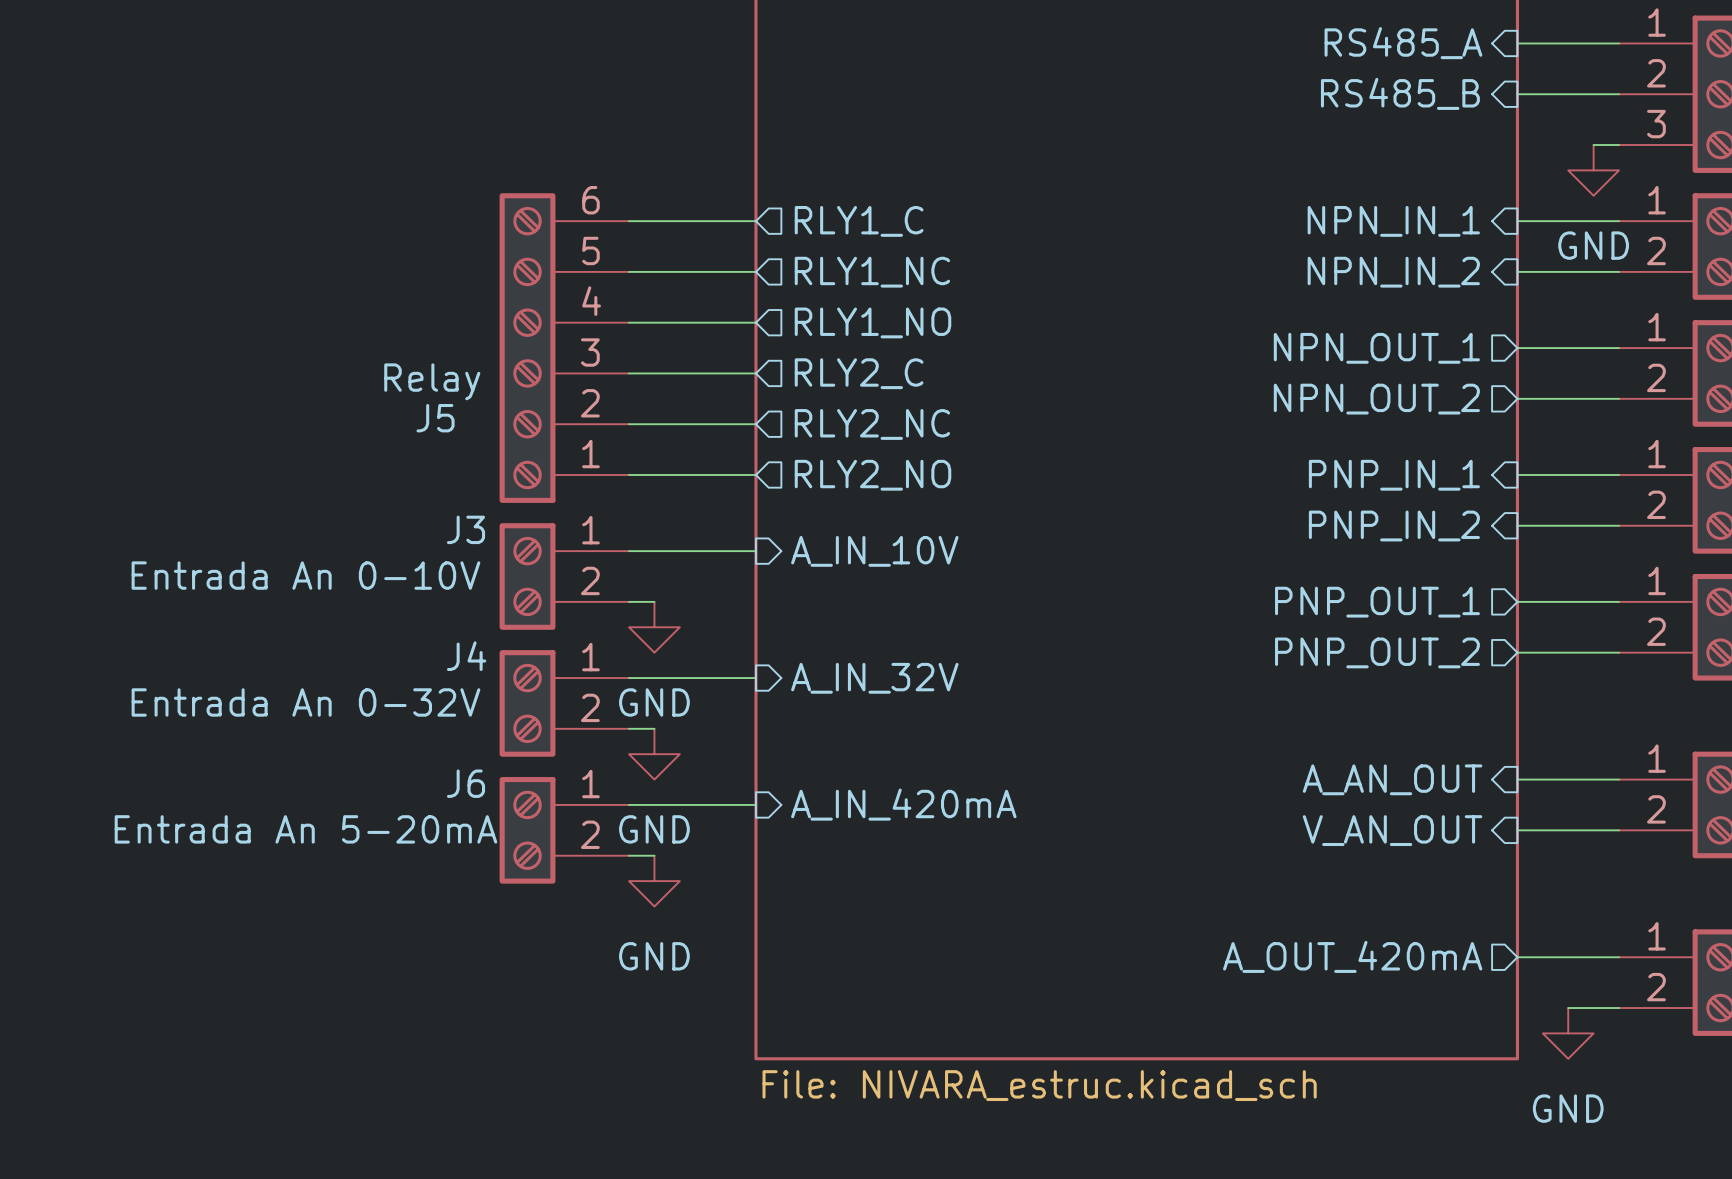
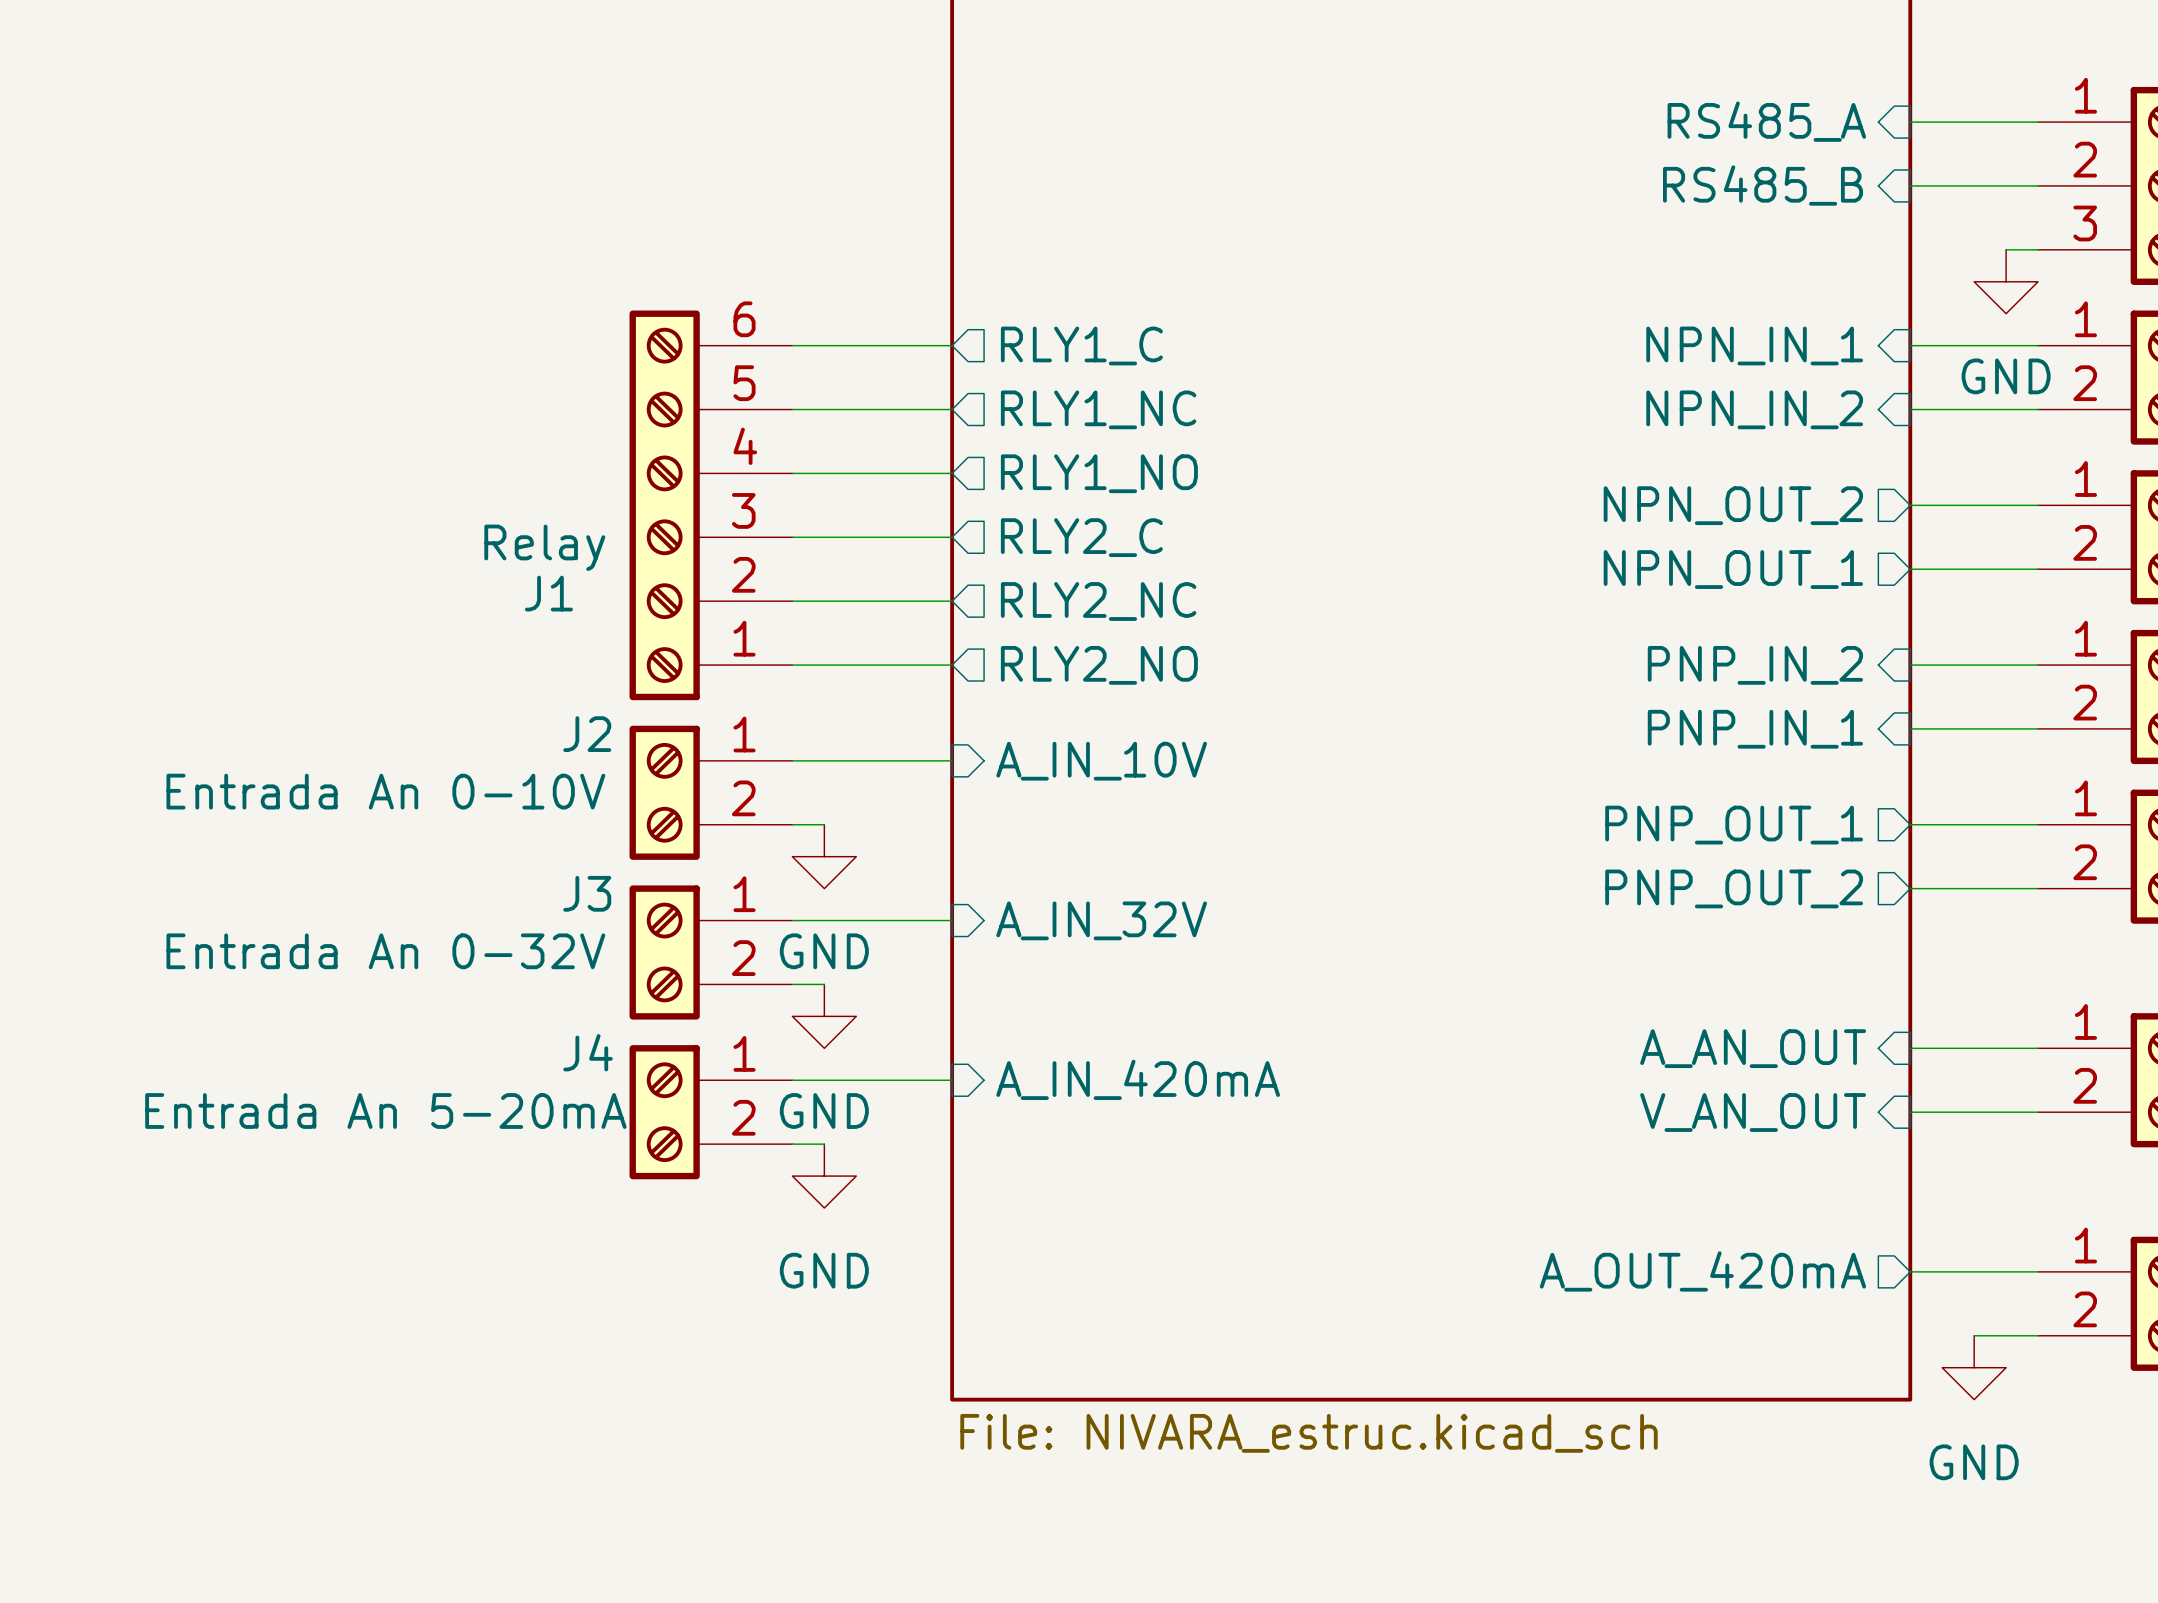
sheet pin: NPN_OUT_1 (1376, 348) -> NPN_OUT_2 (1733, 505)
sheet pin: NPN_OUT_2 (1376, 399) -> NPN_OUT_1 (1733, 569)
J5 name: J5 (435, 418) -> J1 (548, 593)
sheet pin: PNP_IN_1 (1394, 475) -> PNP_IN_2 (1755, 665)
sheet pin: PNP_IN_2 (1394, 526) -> PNP_IN_1 (1755, 729)
J3 name: J3 (466, 529) -> J2 (587, 734)
J4 name: J4 (466, 656) -> J3 (587, 893)
J6 name: J6 (466, 783) -> J4 (588, 1052)

